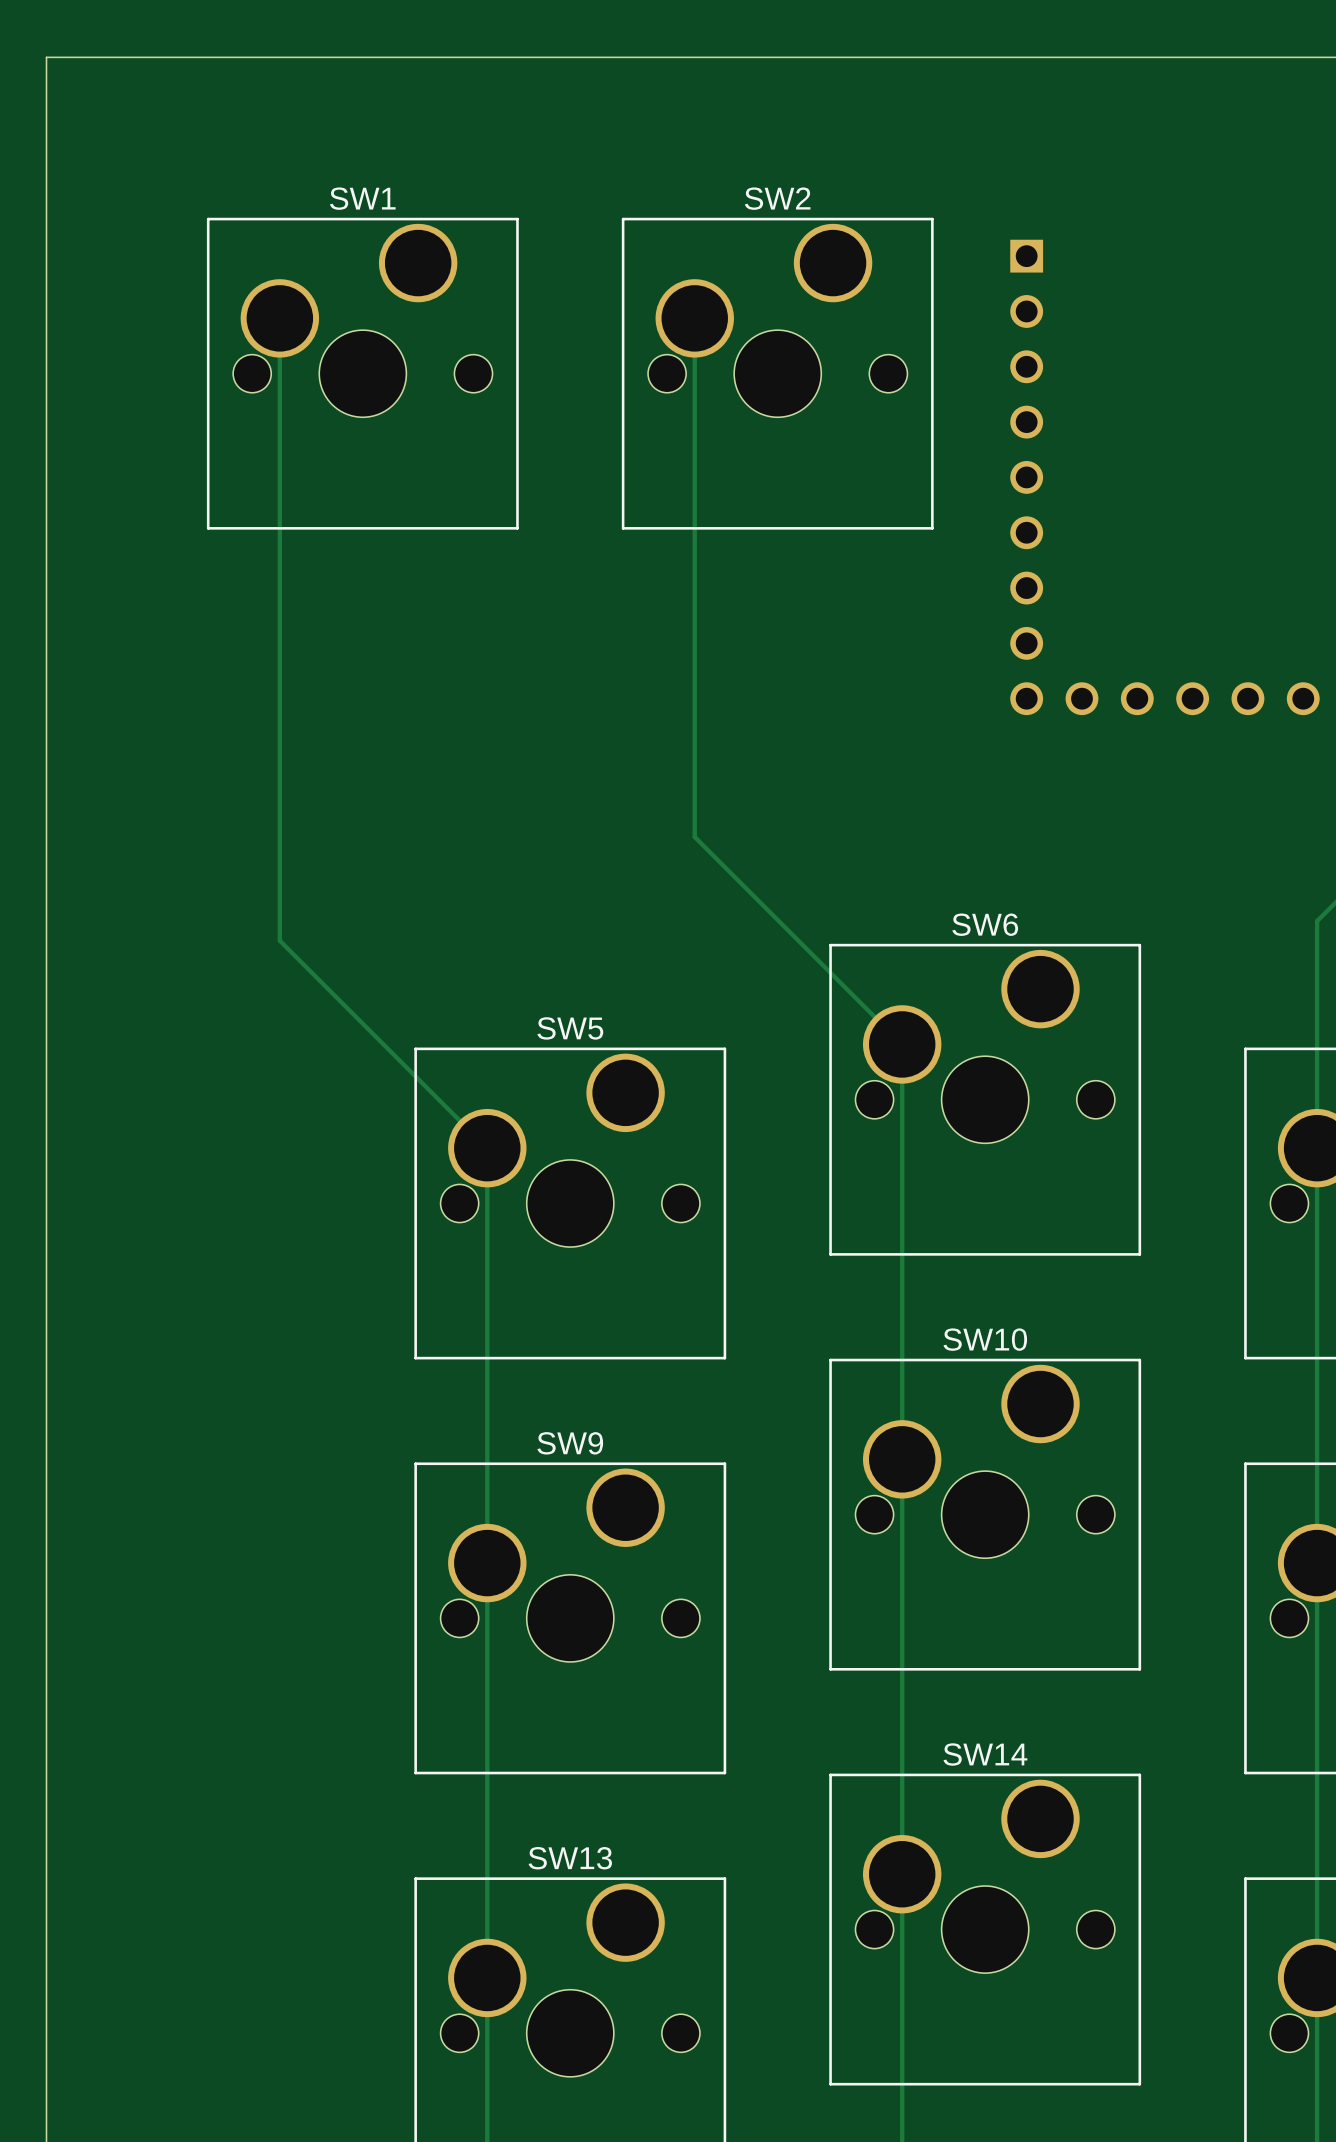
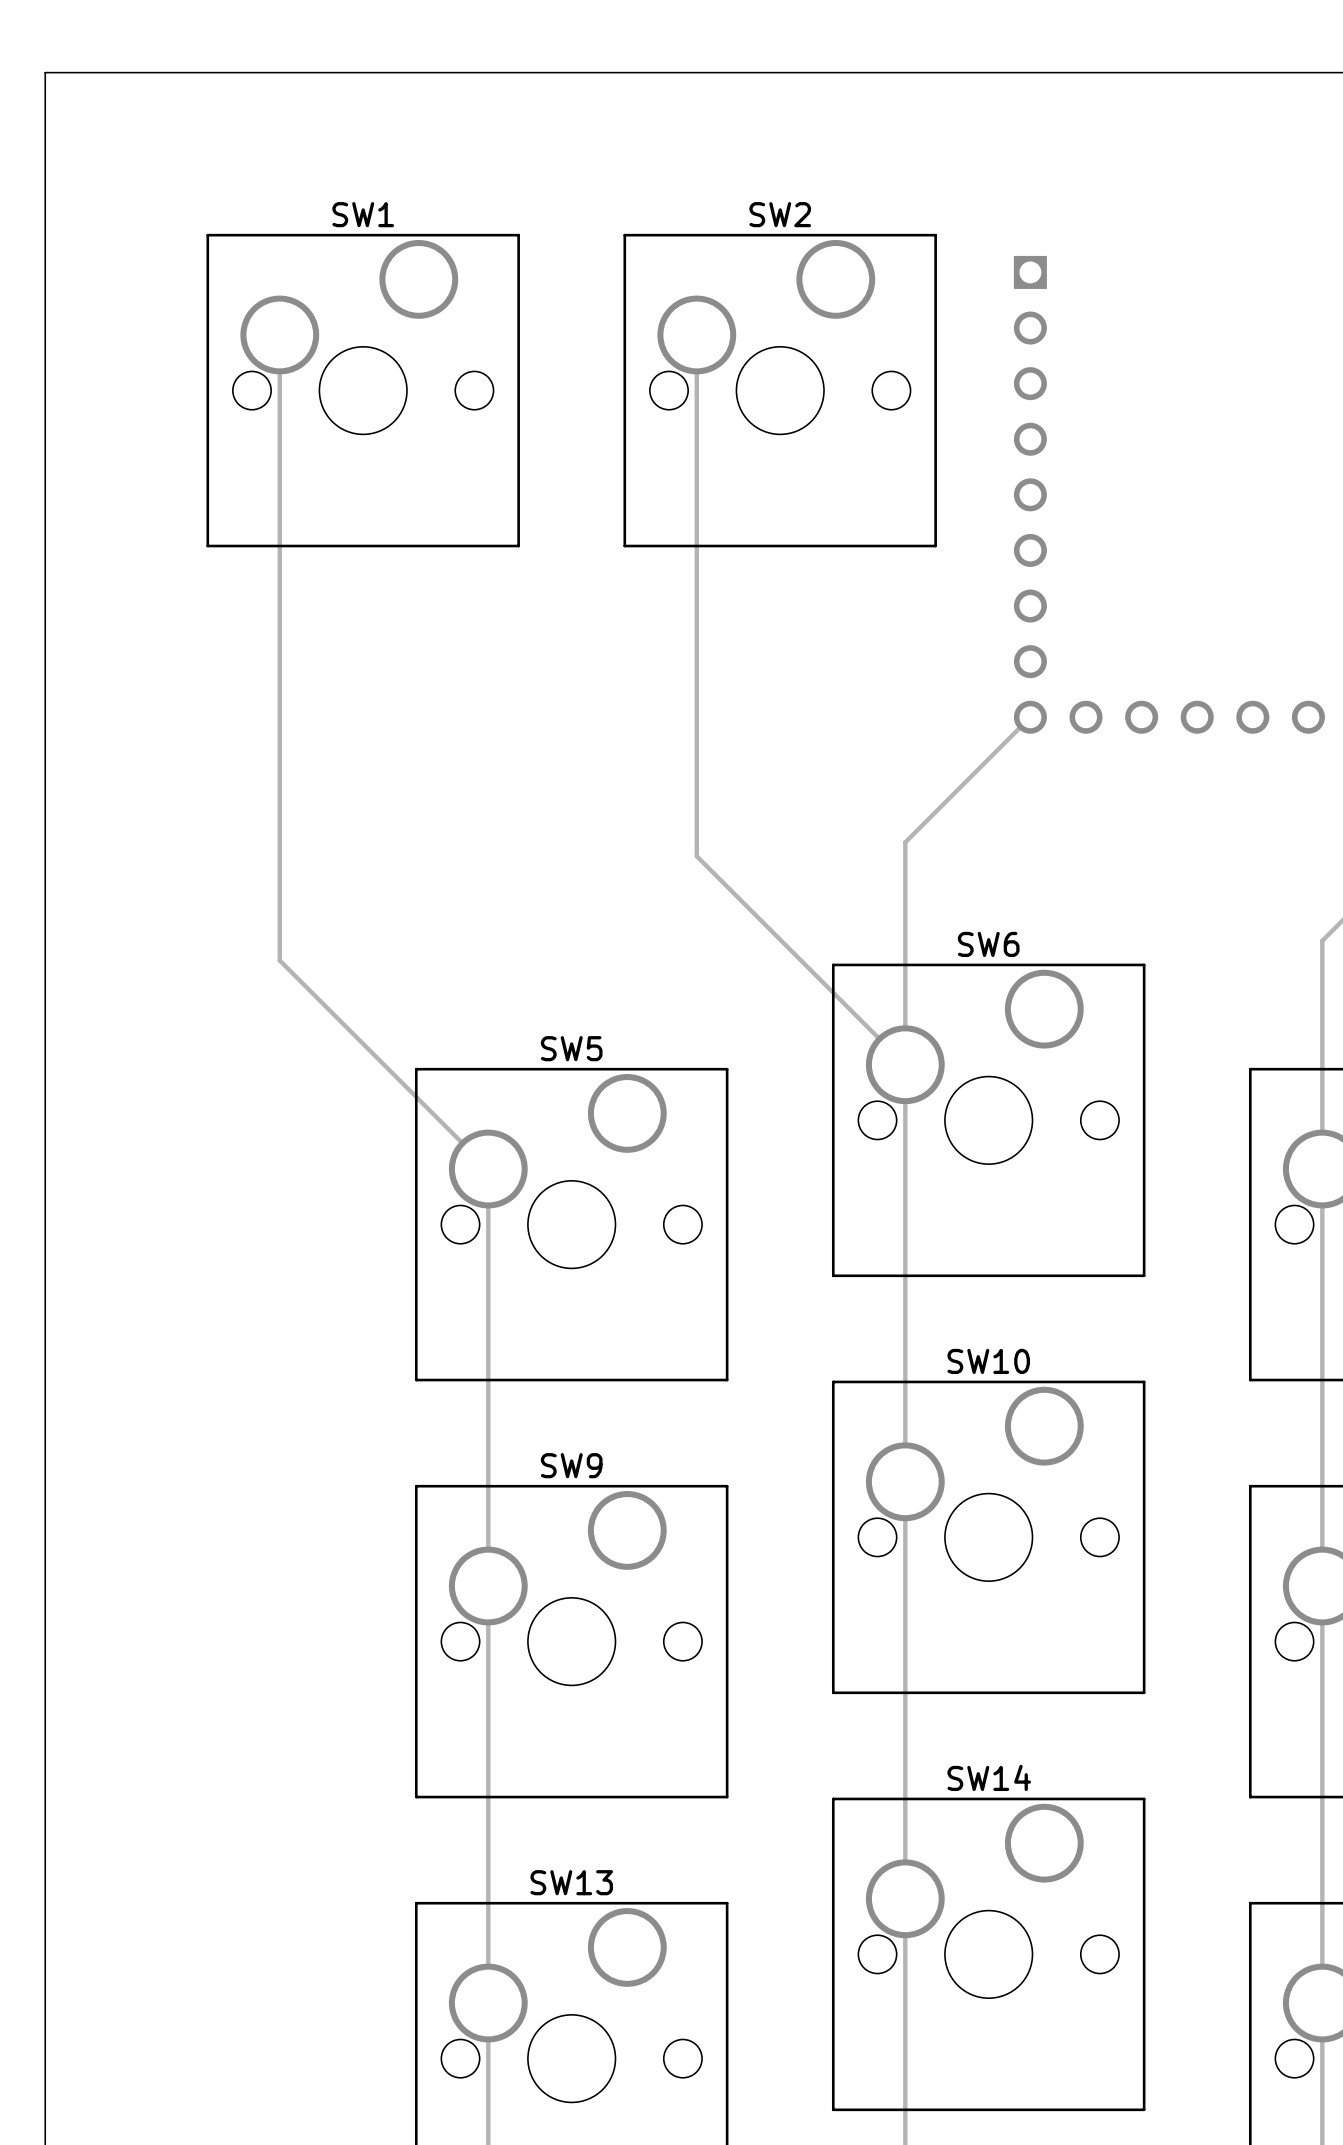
track: none -> (1030, 717) (905, 842) (905, 1064)

